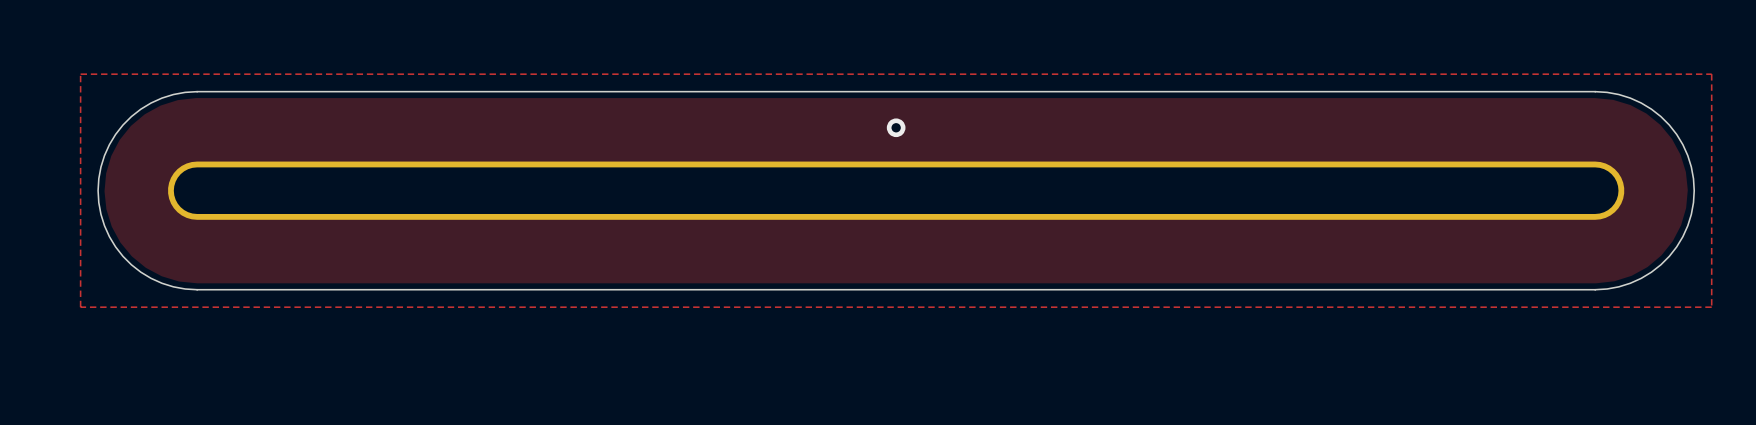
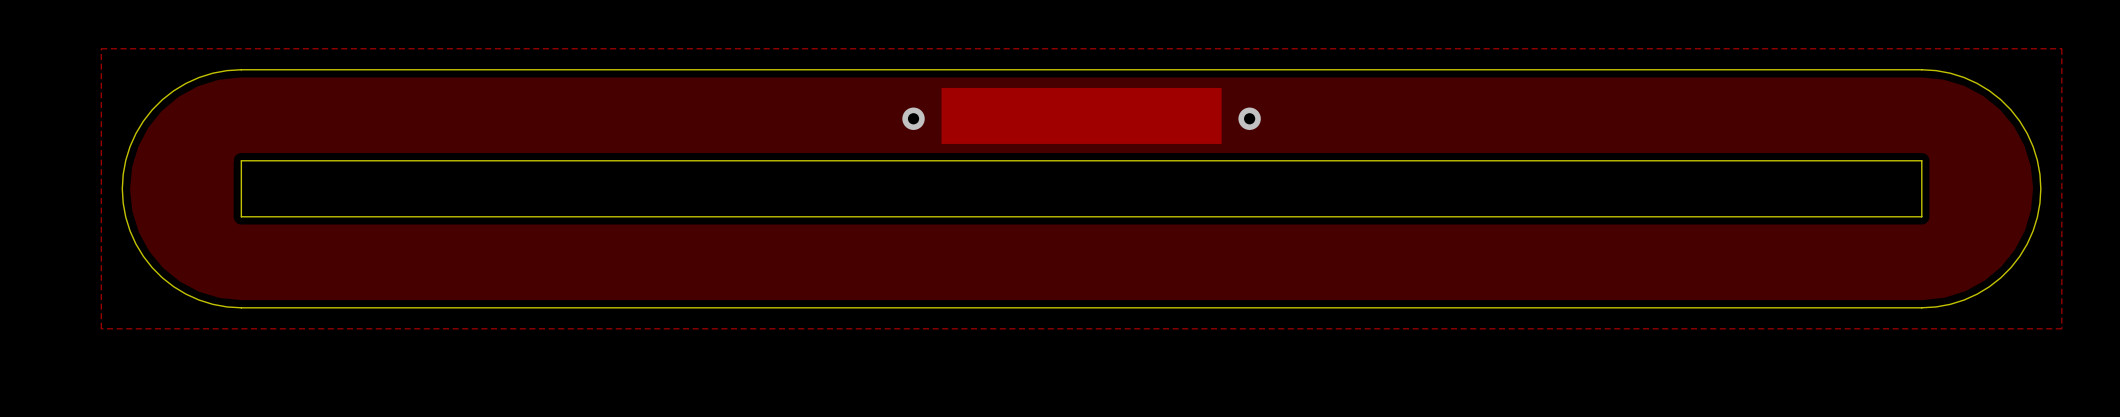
via: (896, 127) -> none
part: none -> (1081, 115)
via: none -> (913, 118)
via: none -> (1249, 118)
board edge: none -> (241, 160) (241, 216) (1921, 216) (1921, 160) (241, 160)
part: (896, 190) -> none

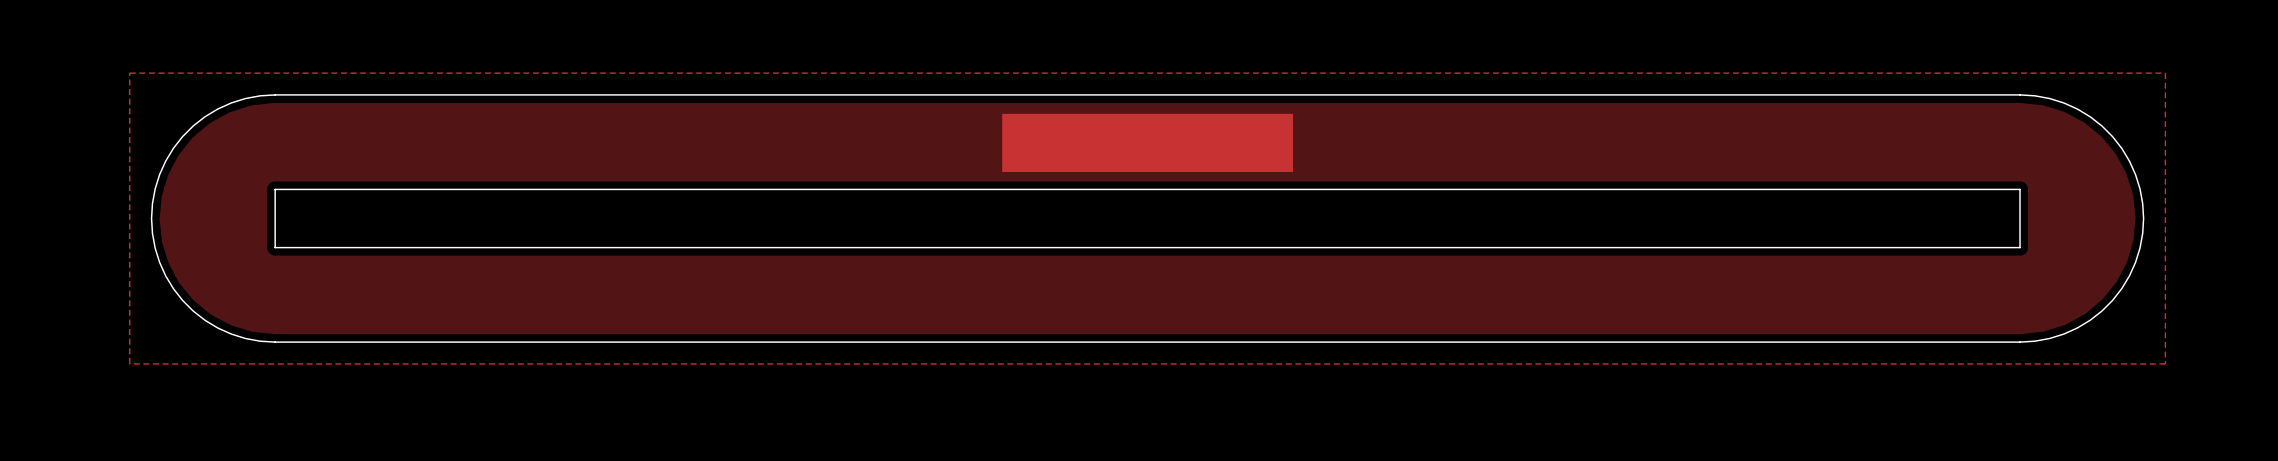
via: (913, 118) -> none
via: (1249, 118) -> none

